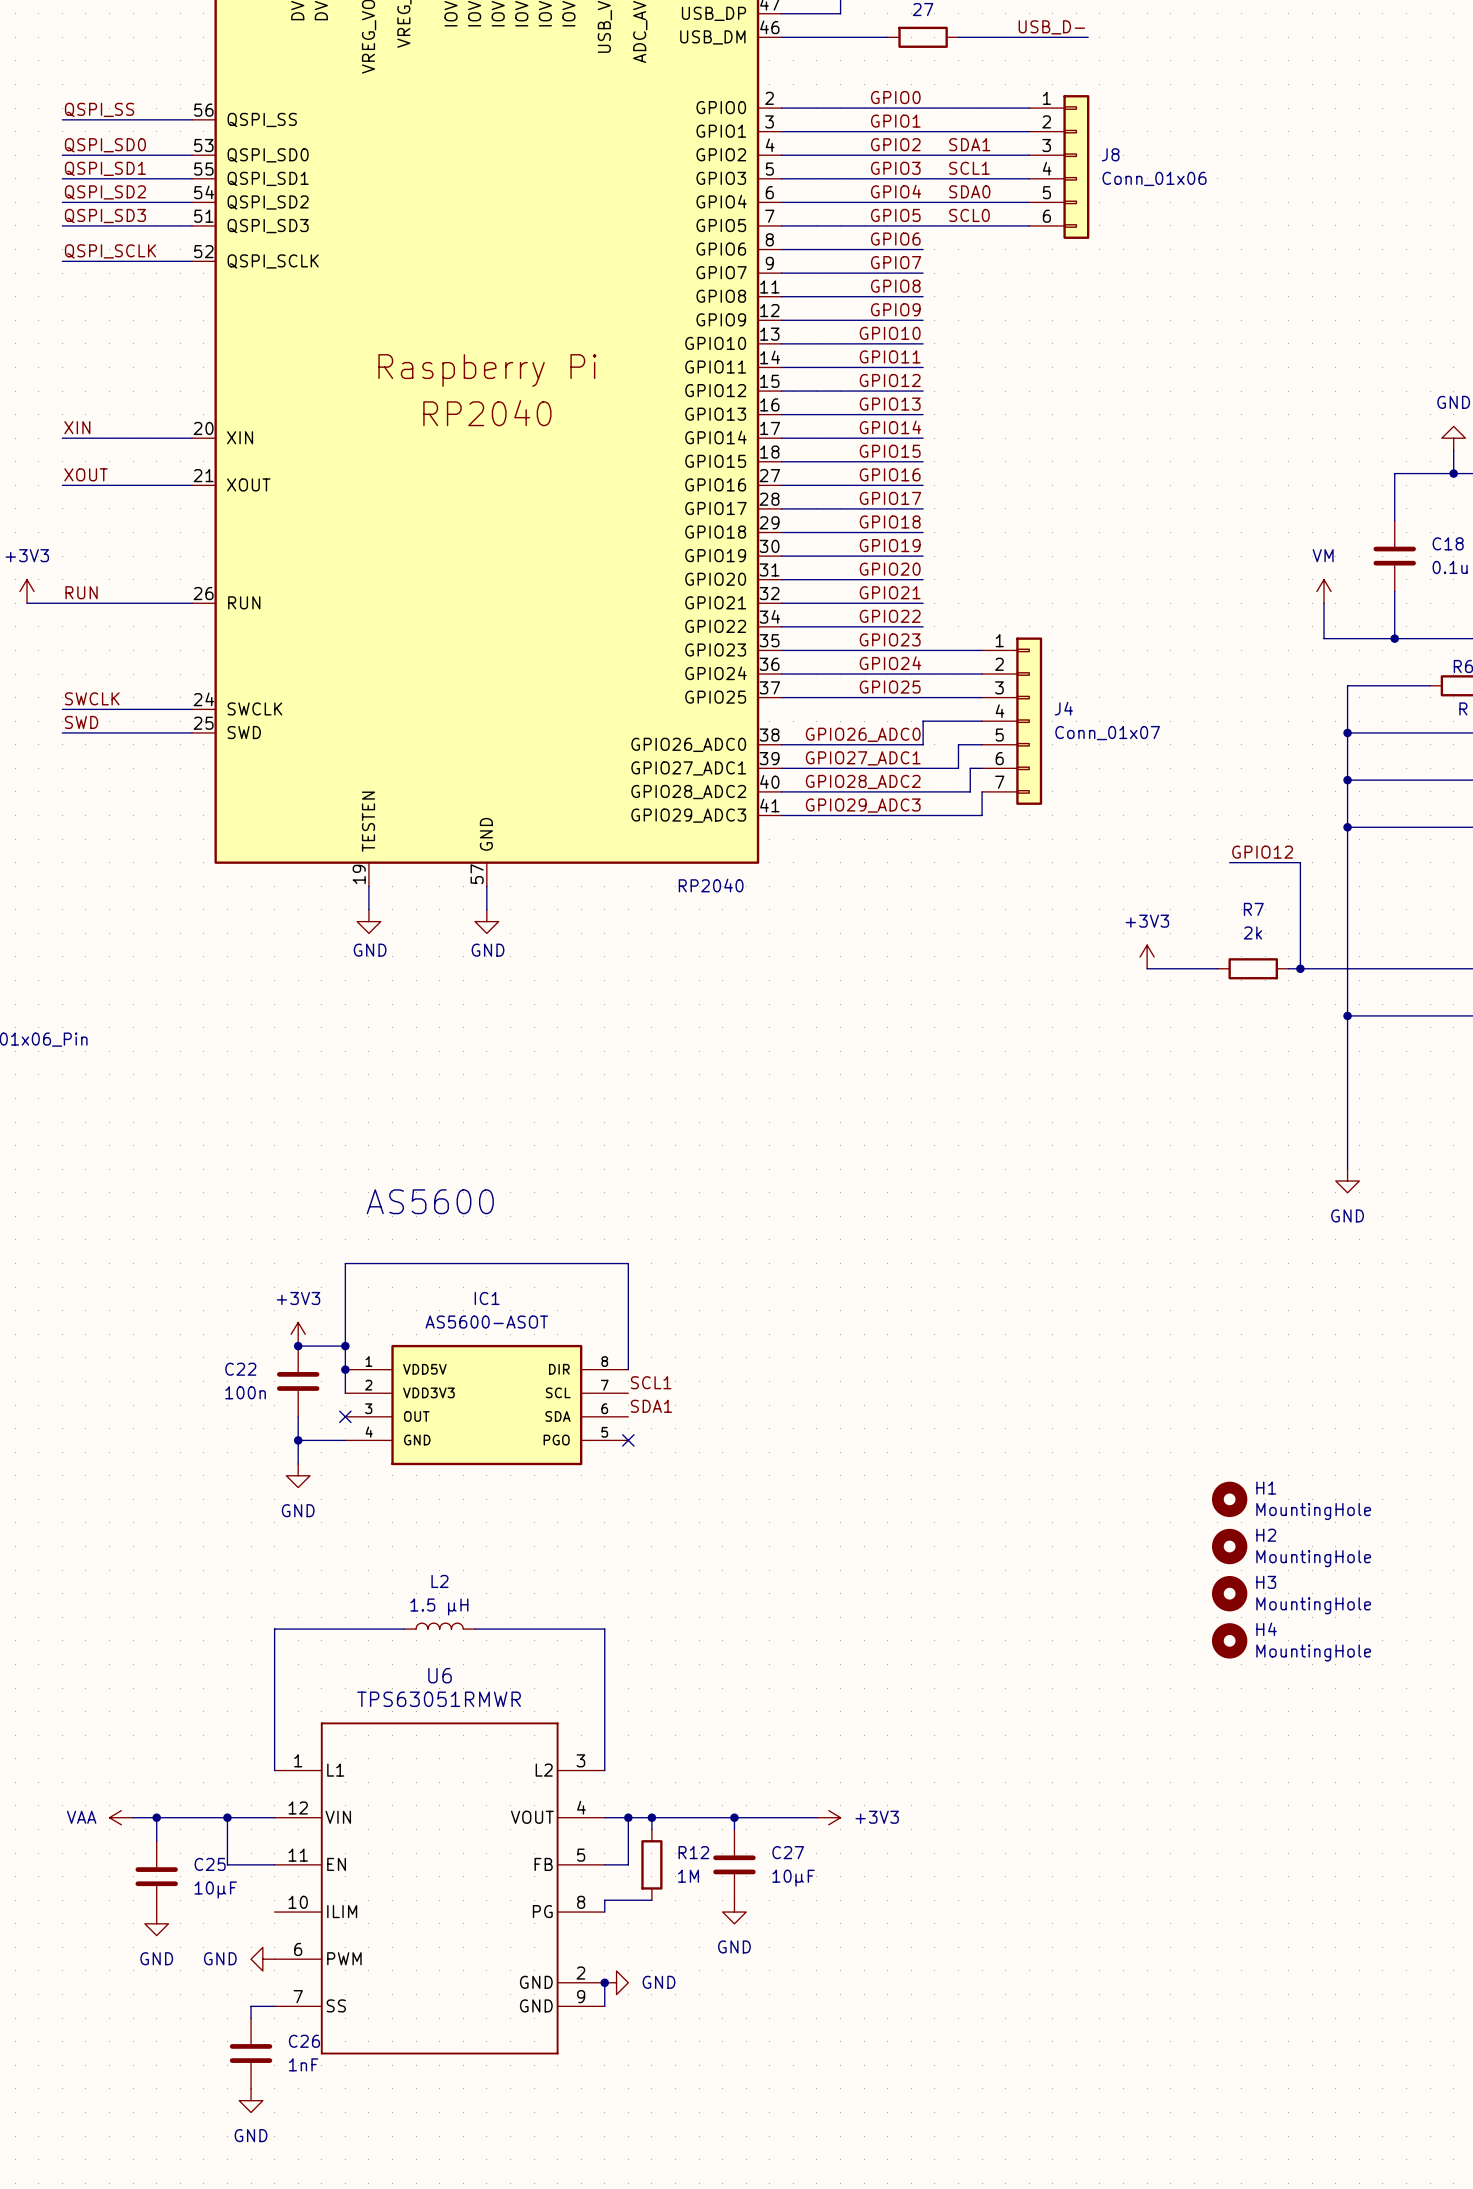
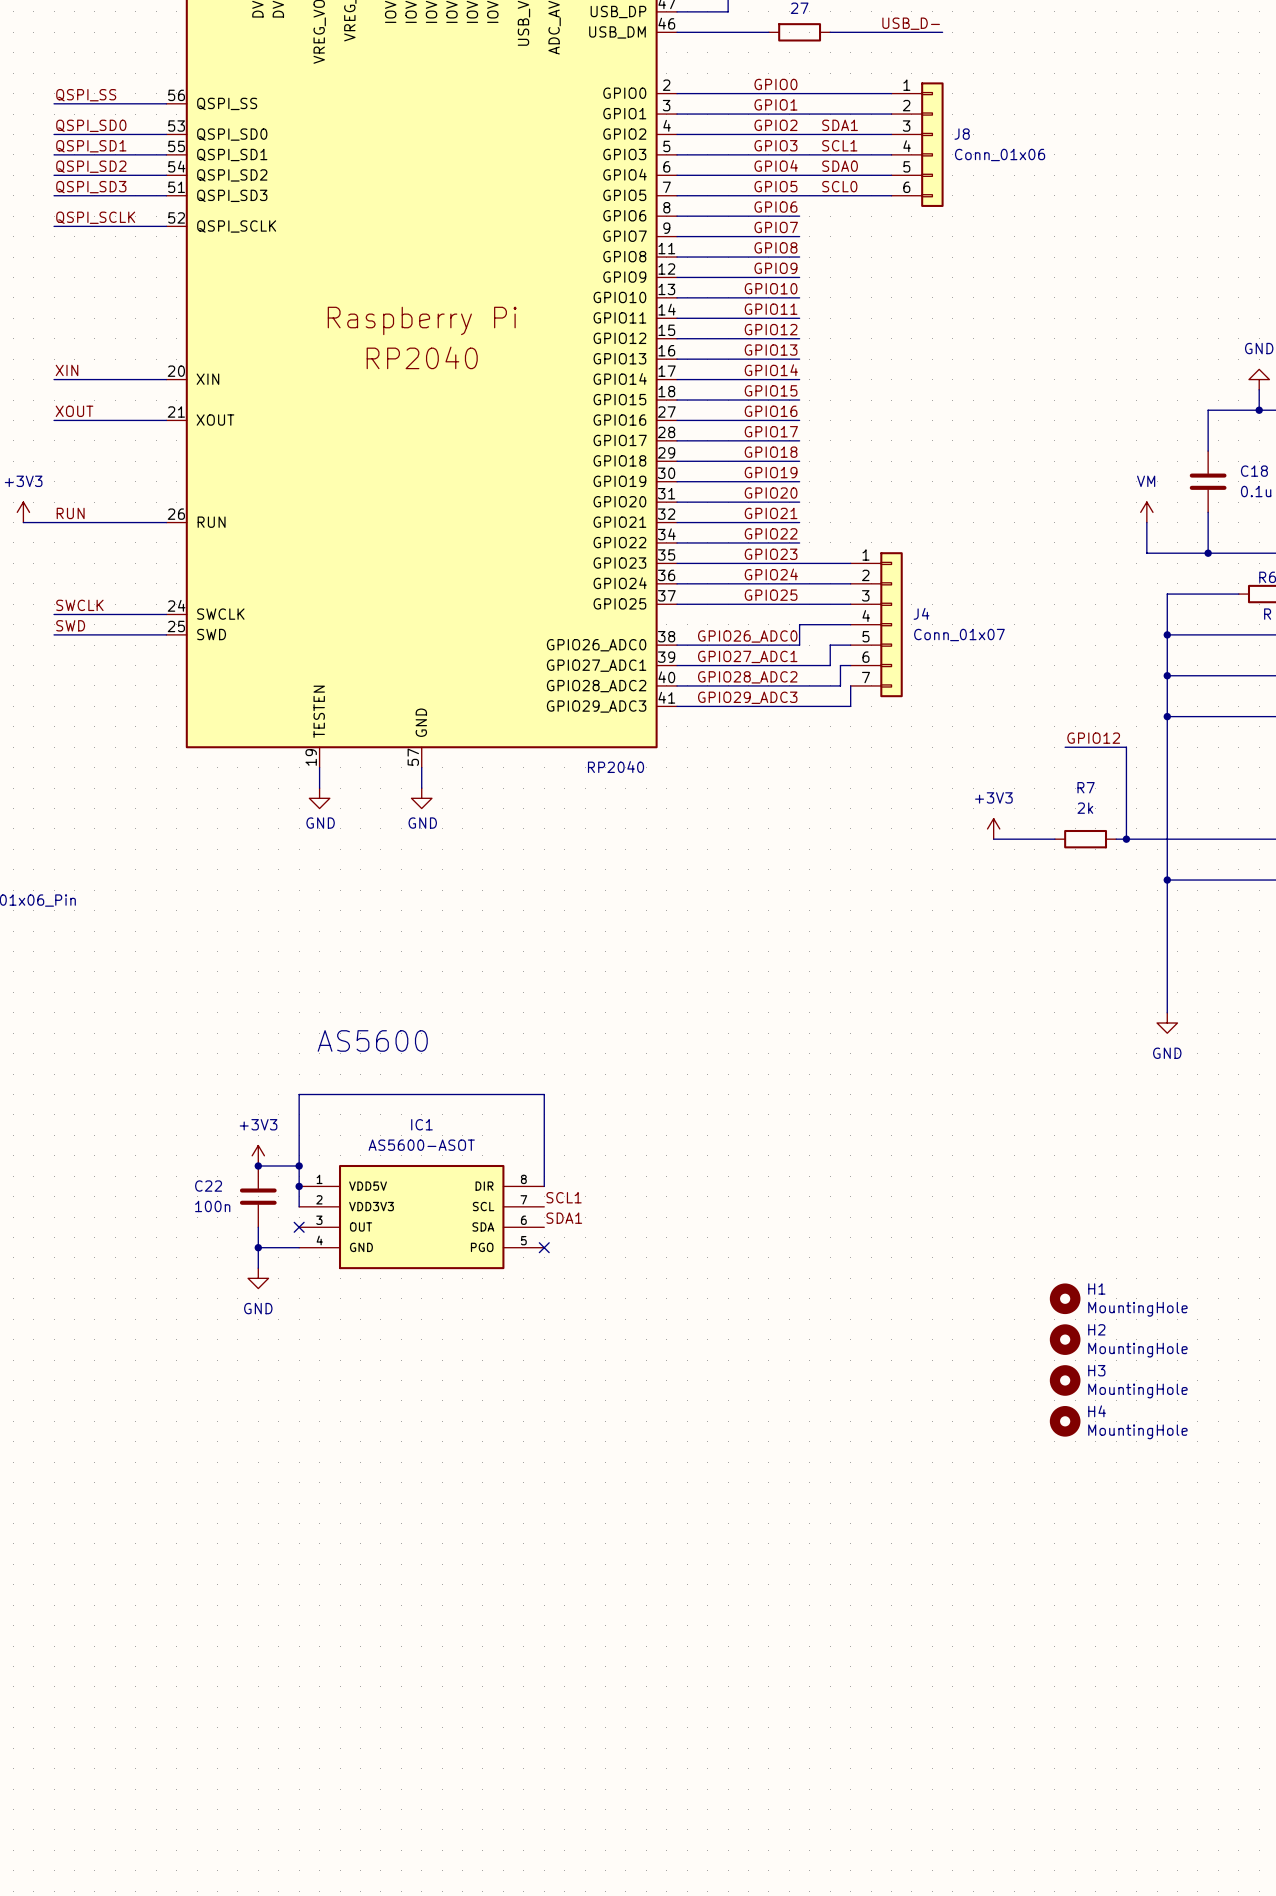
L2: 1.5 μH (439, 1626) -> none
wire: (404, 1629) (274, 1629) (274, 1770) -> none
wire: (475, 1629) (604, 1629) (604, 1770) -> none
power symbol: VAA (121, 1817) -> none
wire: (133, 1817) (274, 1817) -> none
wire: (156, 1817) (156, 1841) -> none
junction: (156, 1817) -> none
wire: (227, 1817) (227, 1864) (274, 1864) -> none
junction: (227, 1817) -> none
wire: (604, 1817) (816, 1817) -> none
wire: (628, 1817) (628, 1864) (604, 1864) -> none
junction: (628, 1817) -> none
wire: (651, 1817) (651, 1829) -> none
junction: (651, 1817) -> none
wire: (734, 1817) (734, 1829) -> none
junction: (734, 1817) -> none
power symbol: +3V3 (828, 1817) -> none
R12: 1M (651, 1864) -> none
C27: 10μF (734, 1864) -> none
C25: 10μF (156, 1876) -> none
U6: TPS63051RMWR (439, 1888) -> none
wire: (651, 1900) (604, 1900) (604, 1912) -> none
power symbol: GND (734, 1912) -> none
power symbol: GND (156, 1923) -> none
power symbol: GND (262, 1959) -> none
wire: (604, 1982) (604, 2006) -> none
junction: (604, 1982) -> none
power symbol: GND (616, 1982) -> none
wire: (274, 2006) (251, 2006) (251, 2018) -> none
C26: 1nF (251, 2053) -> none
power symbol: GND (251, 2100) -> none

